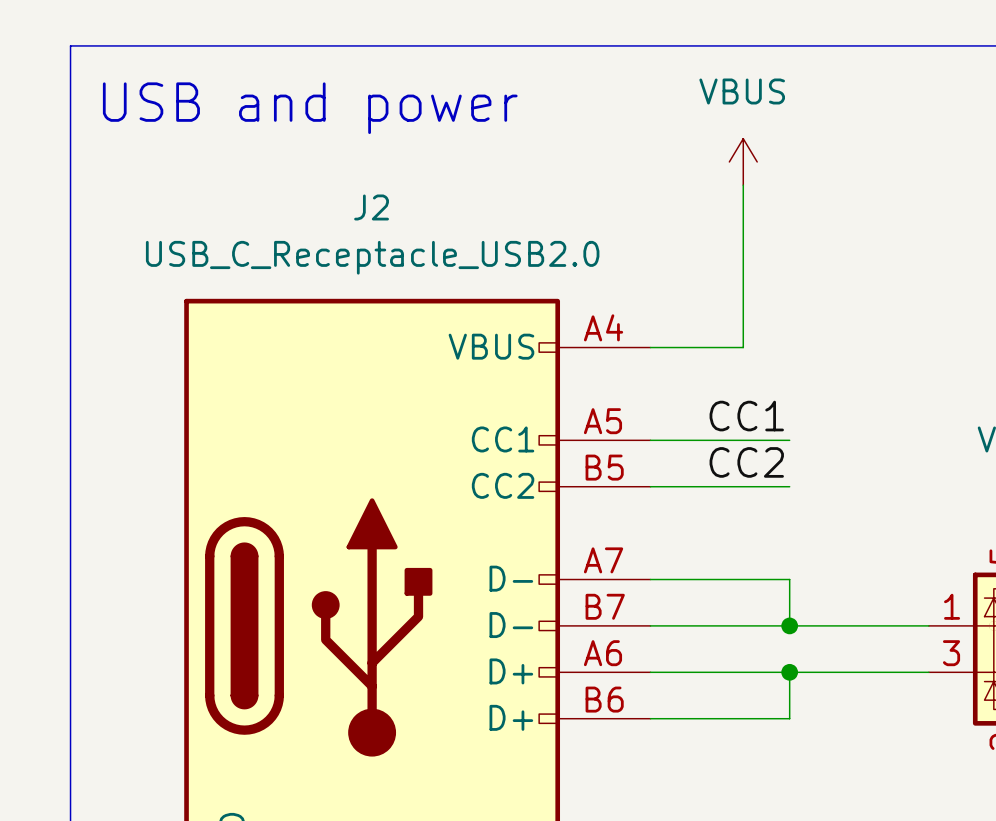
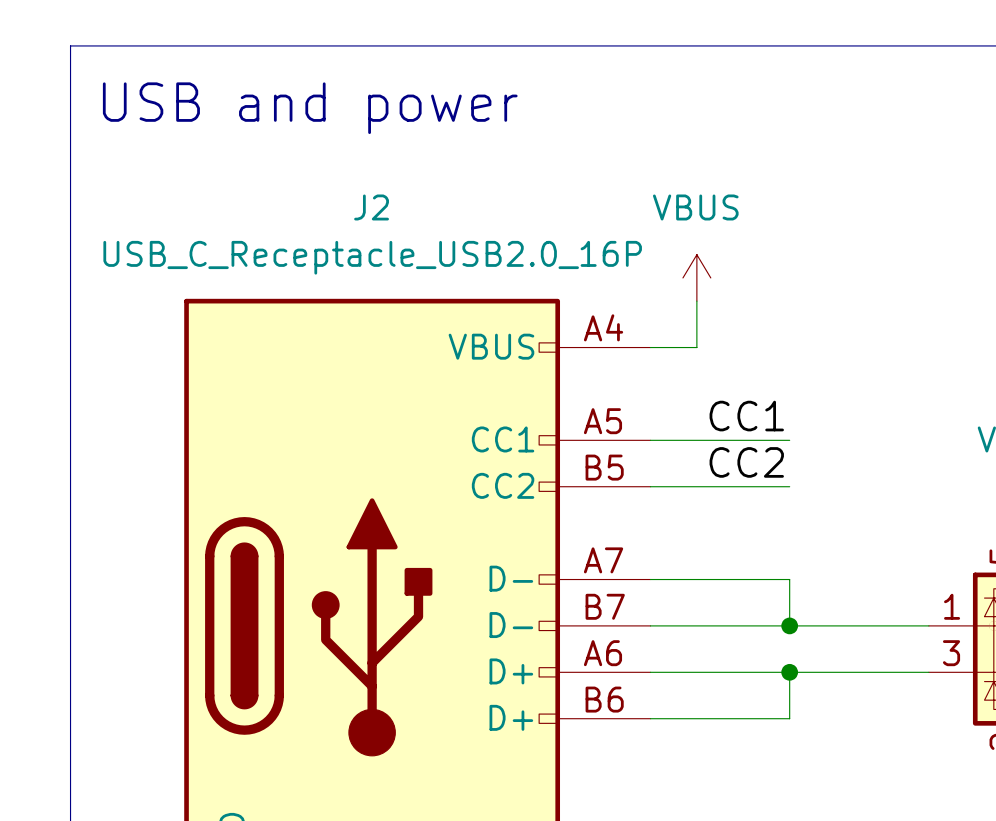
power symbol position: VBUS (743, 161) -> VBUS (696, 277)
wire: (743, 185) (743, 347) (696, 347) -> (696, 301) (696, 347)
J2 value: USB_C_Receptacle_USB2.0 (372, 257) -> USB_C_Receptacle_USB2.0_16P (372, 257)

